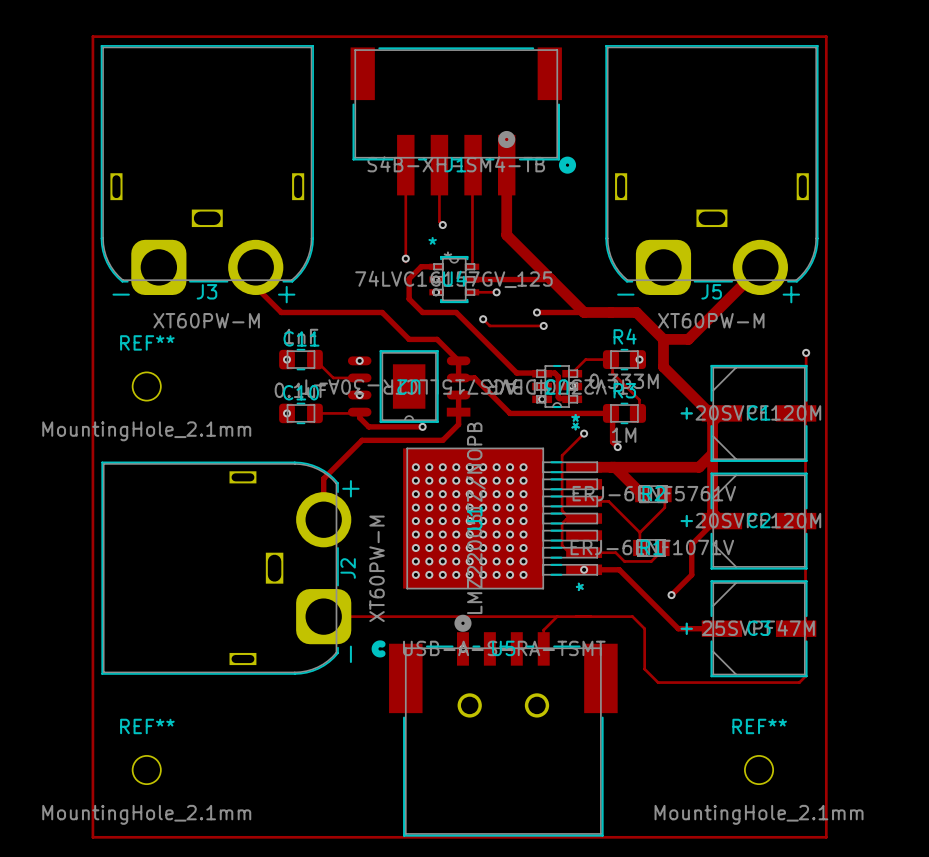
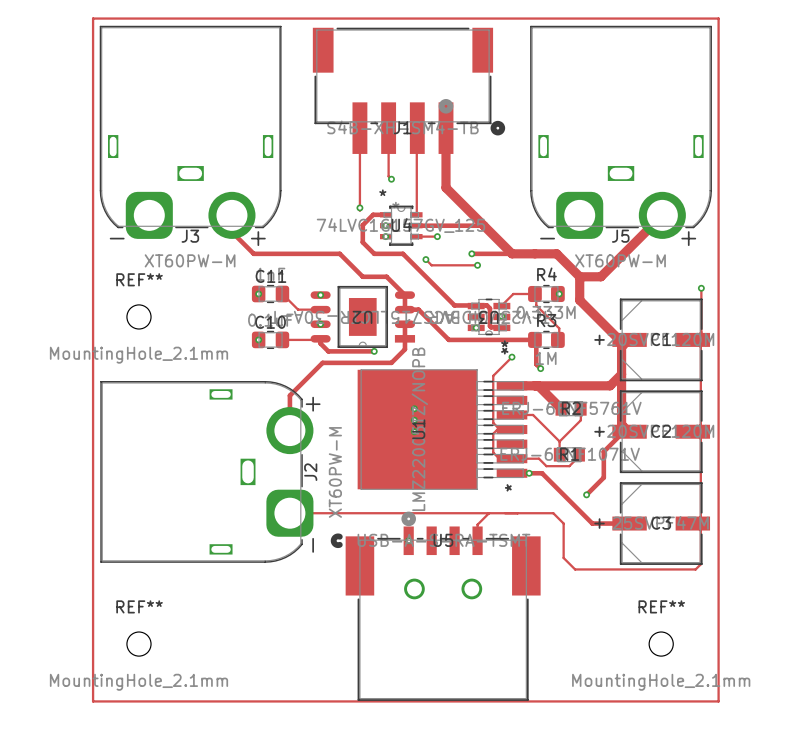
via: (415, 467) -> none
via: (429, 467) -> none
via: (442, 467) -> none
via: (456, 467) -> none
via: (469, 467) -> none
via: (483, 467) -> none
via: (496, 467) -> none
via: (510, 467) -> none
via: (523, 467) -> none
via: (415, 480) -> none
via: (429, 480) -> none
via: (442, 480) -> none
via: (456, 480) -> none
via: (469, 480) -> none
via: (483, 480) -> none
via: (496, 480) -> none
via: (510, 480) -> none
via: (523, 480) -> none
via: (415, 494) -> none
via: (429, 494) -> none
via: (442, 494) -> none
via: (456, 494) -> none
via: (483, 494) -> none
via: (496, 494) -> none
via: (510, 494) -> none
via: (523, 494) -> none
via: (415, 507) -> none
via: (429, 507) -> none
via: (442, 507) -> none
via: (456, 507) -> none
via: (483, 507) -> none
via: (496, 507) -> none
via: (510, 507) -> none
via: (523, 507) -> none
via: (415, 521) -> none
via: (429, 521) -> none
via: (442, 521) -> none
via: (456, 521) -> none
via: (483, 521) -> none
via: (496, 521) -> none
via: (510, 521) -> none
via: (523, 521) -> none
via: (415, 534) -> none
via: (429, 534) -> none
via: (442, 534) -> none
via: (456, 534) -> none
via: (469, 534) -> none
via: (483, 534) -> none
via: (496, 534) -> none
via: (510, 534) -> none
via: (523, 534) -> none
via: (415, 547) -> none
via: (429, 547) -> none
via: (442, 547) -> none
via: (456, 547) -> none
via: (469, 547) -> none
via: (483, 547) -> none
via: (496, 547) -> none
via: (510, 547) -> none
via: (523, 547) -> none
via: (415, 561) -> none
via: (429, 561) -> none
via: (442, 561) -> none
via: (456, 561) -> none
via: (469, 561) -> none
via: (483, 561) -> none
via: (496, 561) -> none
via: (510, 561) -> none
via: (523, 561) -> none
via position: (584, 569) -> (529, 473)
via: (415, 574) -> none
via: (429, 574) -> none
via: (442, 574) -> none
via: (456, 574) -> none
via: (469, 574) -> none
via: (483, 574) -> none
via: (496, 574) -> none
via: (510, 574) -> none
via: (523, 574) -> none

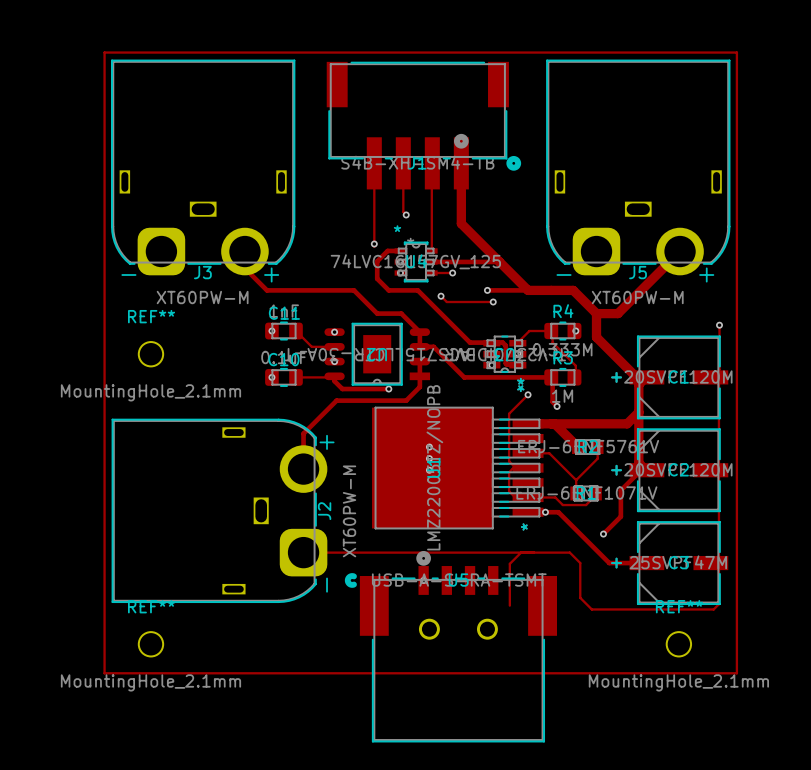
track: (489, 513) (477, 524) (477, 540) -> none
track: none -> (521, 552) (509, 563) (509, 605)
track: (93, 632) (93, 701) (718, 701) (718, 632) -> (104, 673) (736, 673)
REF** position: (138, 644) -> (150, 644)
REF** position: (661, 644) -> (678, 644)

